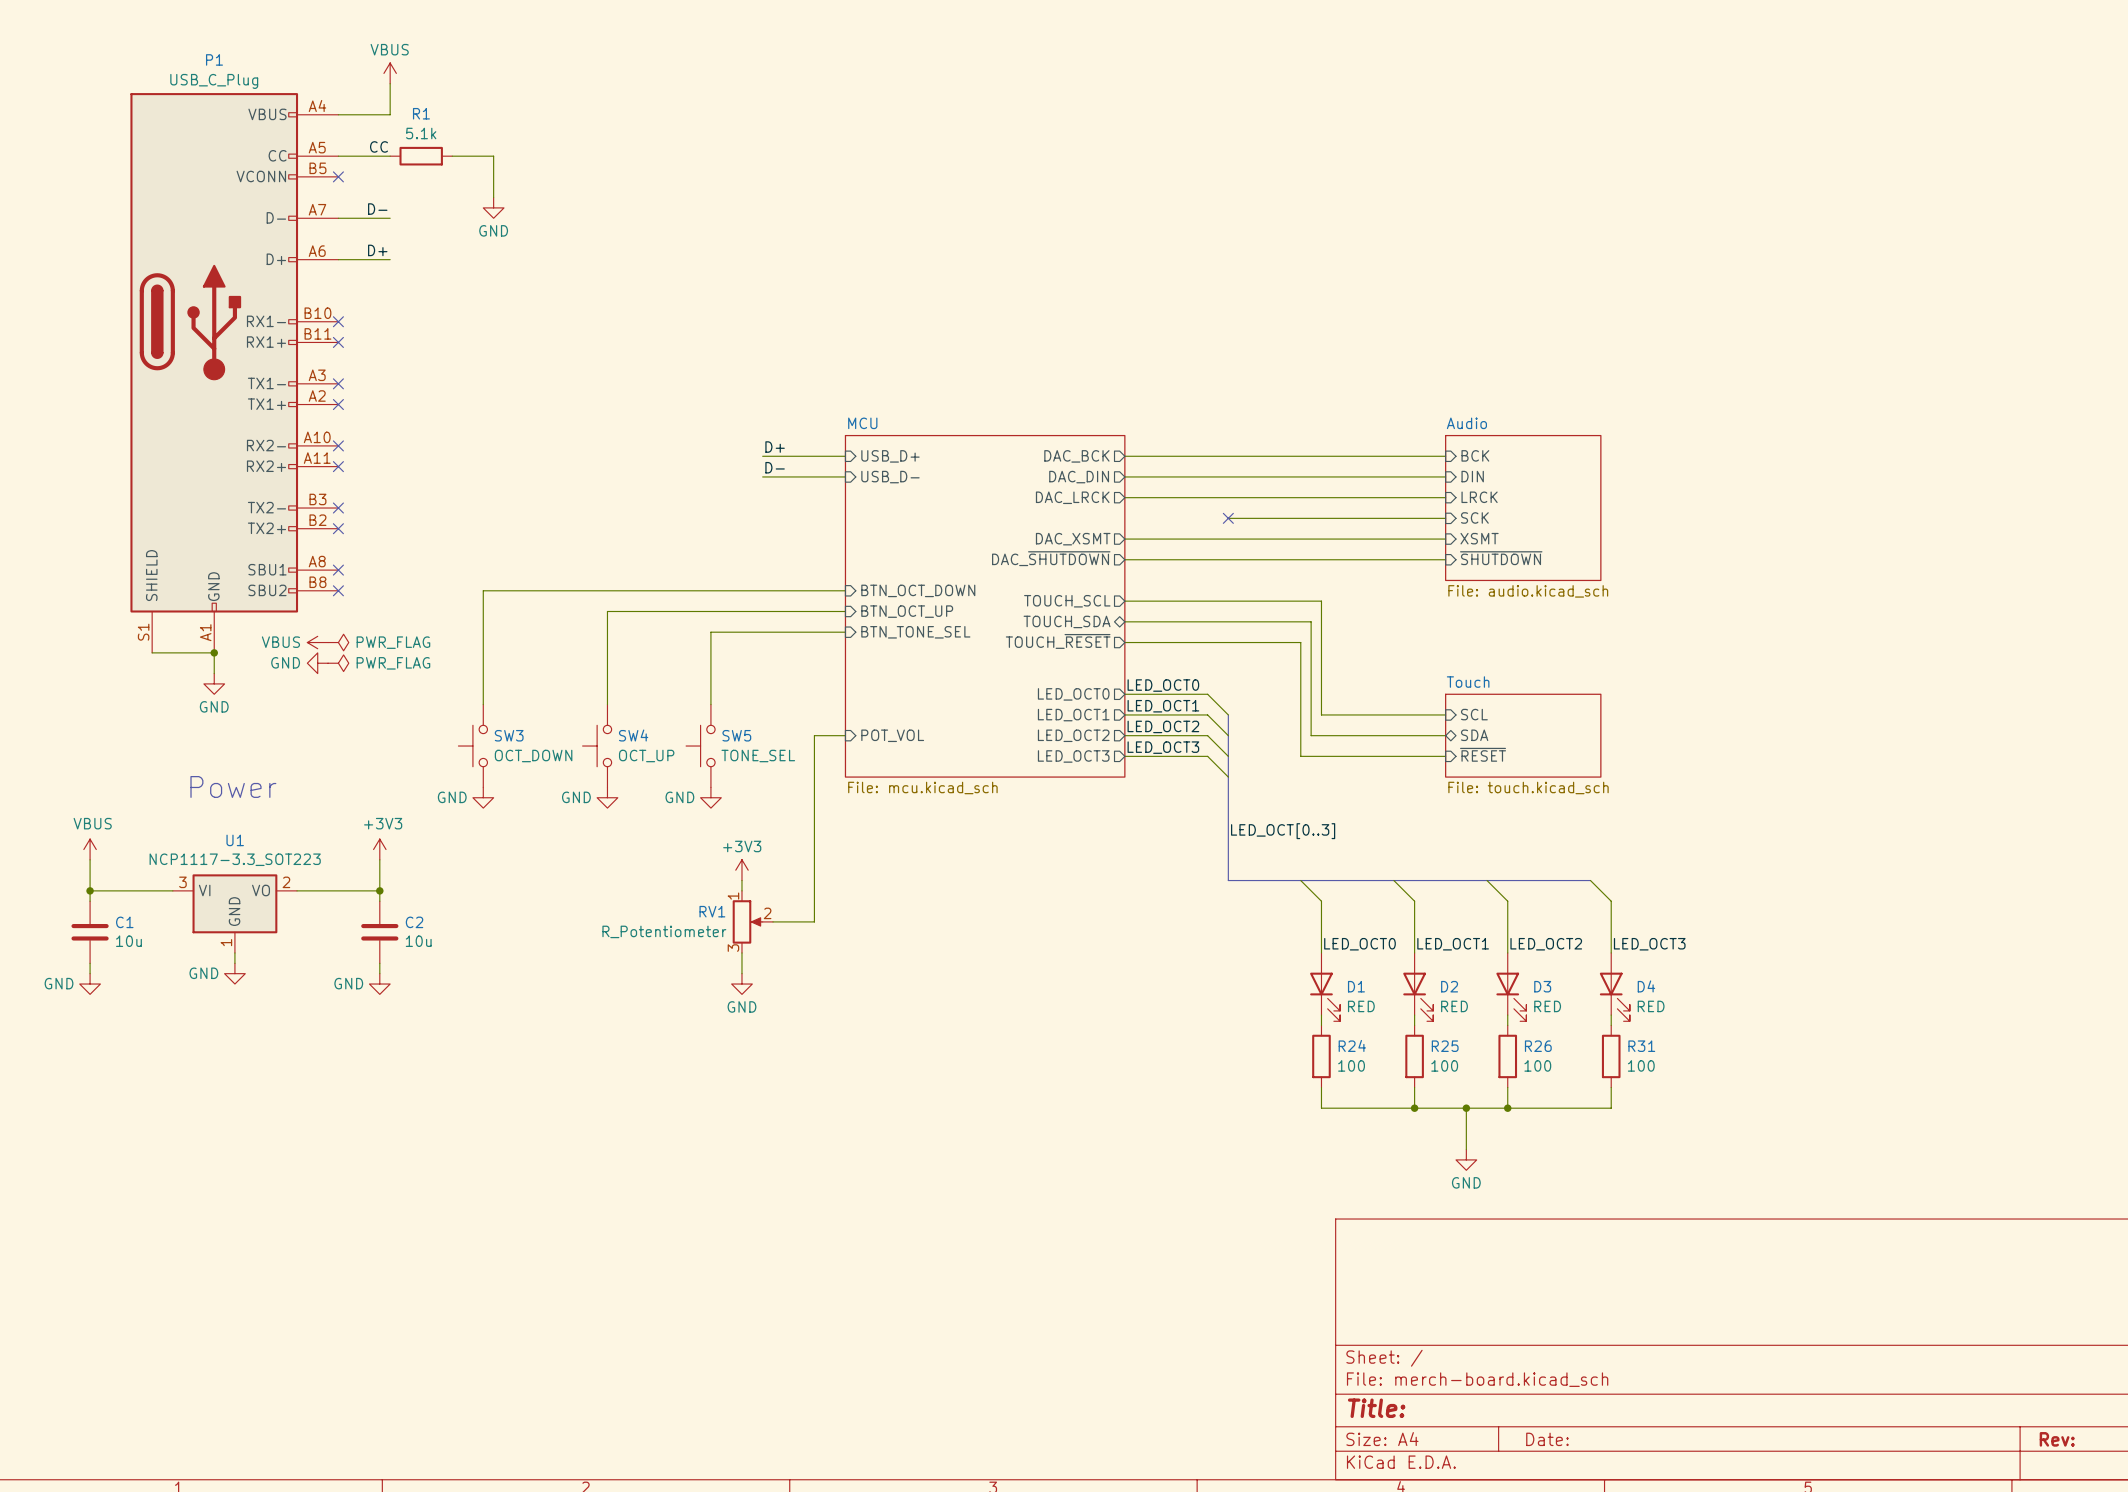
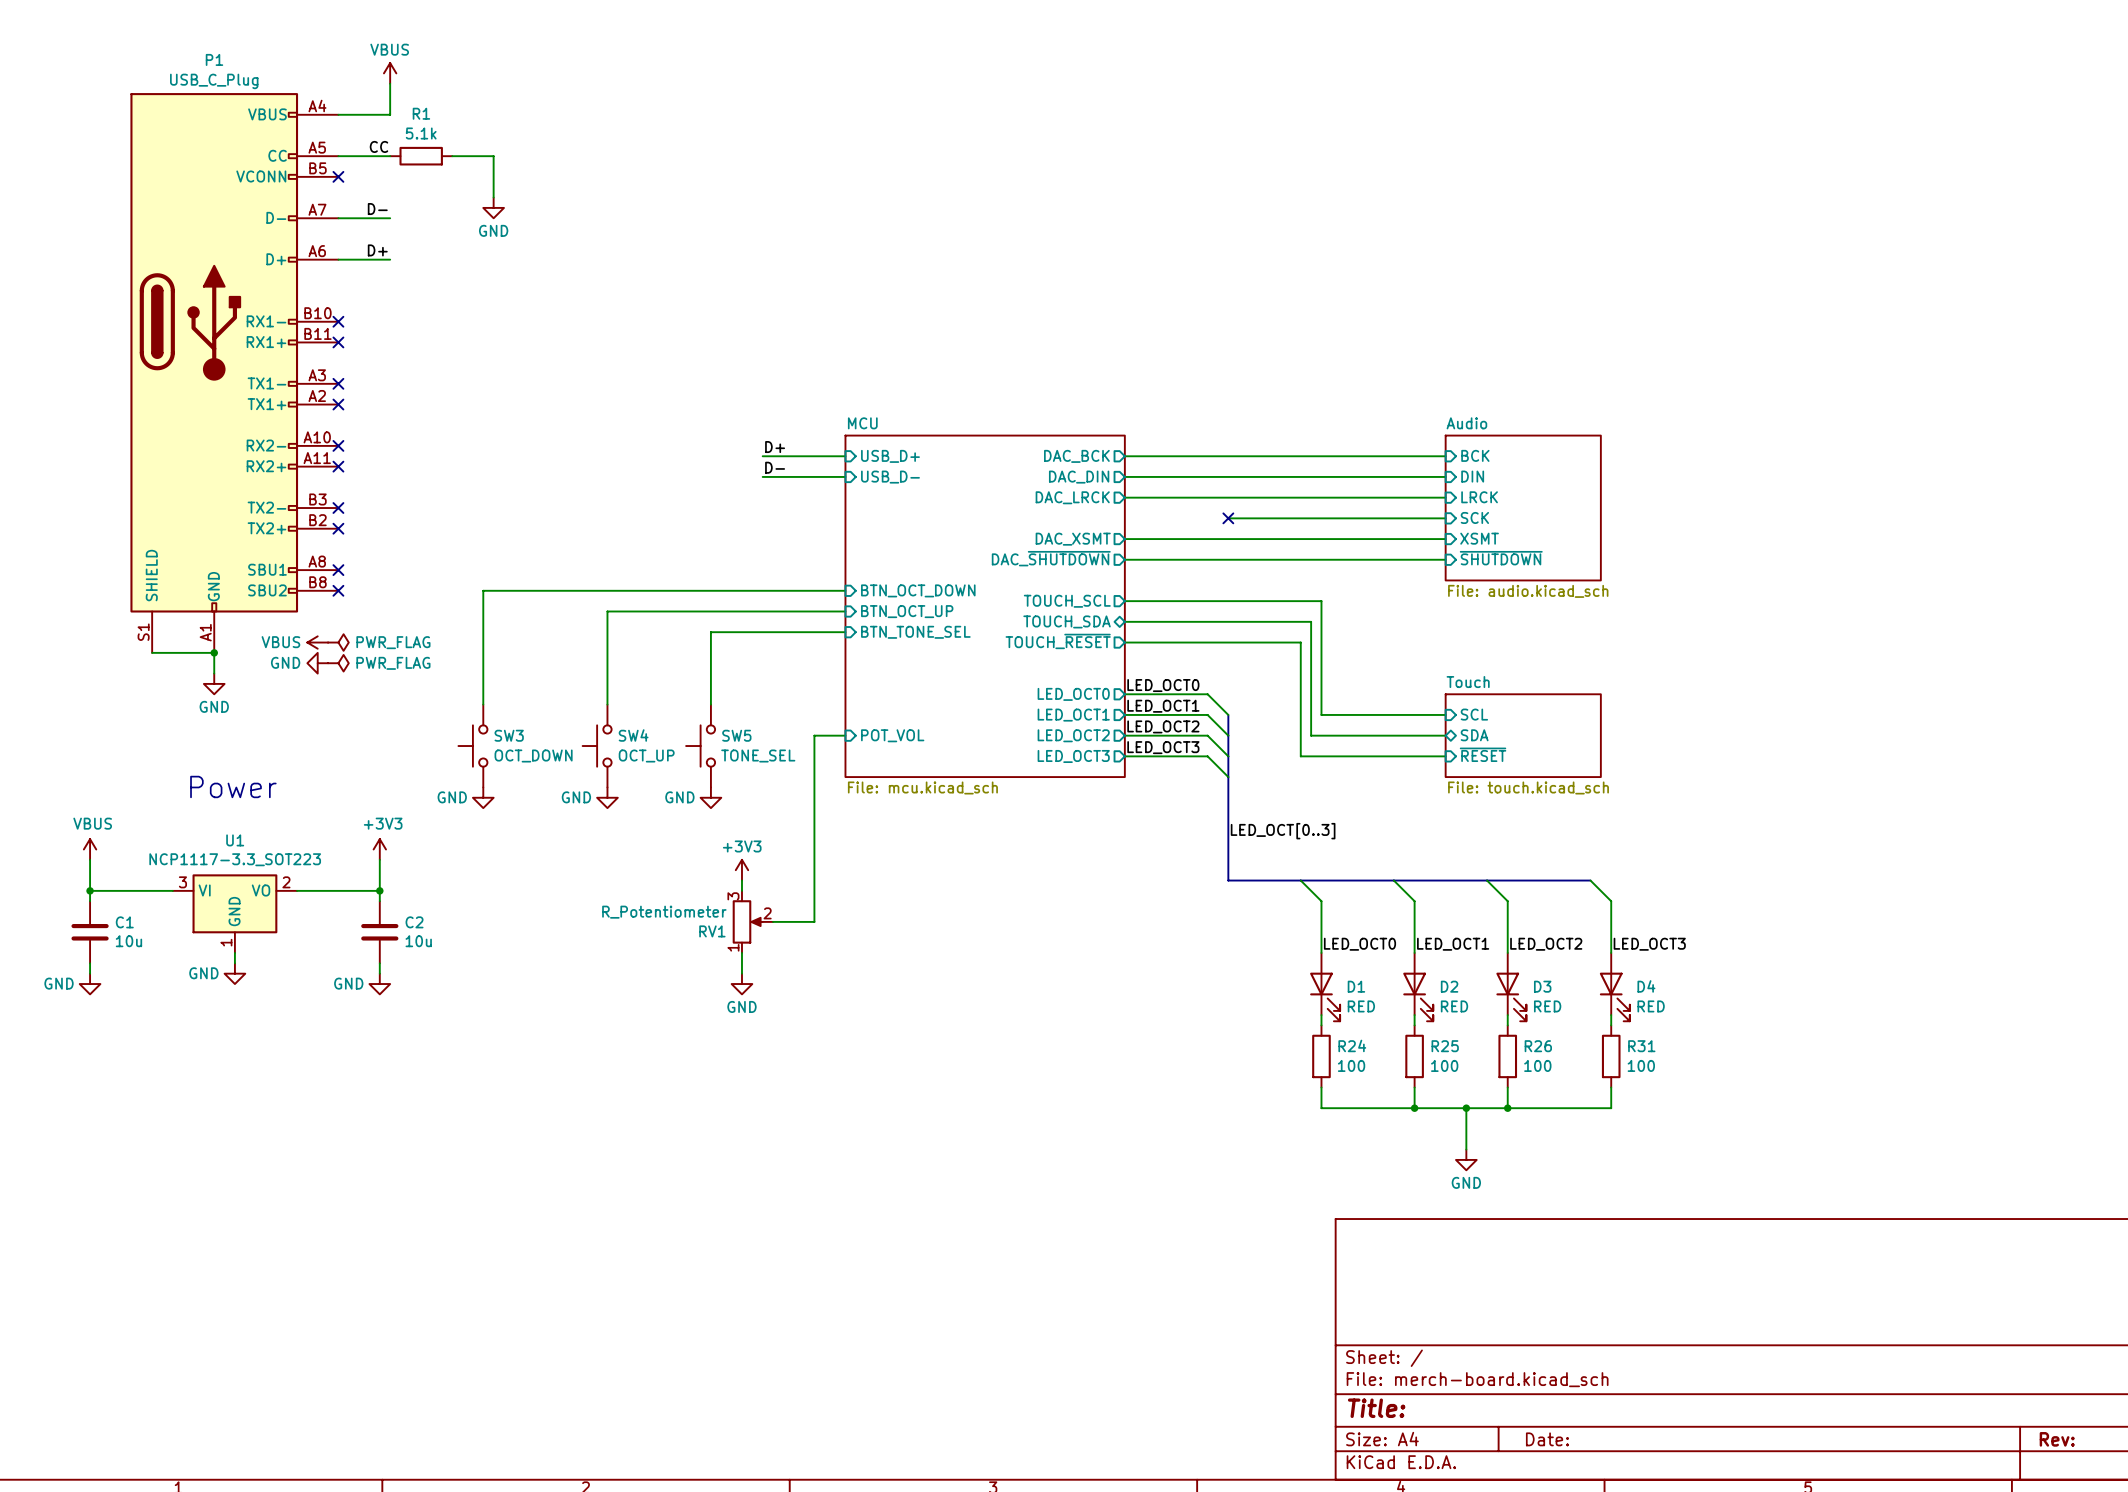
RV1 flip: as is (747, 921) -> up-down (747, 921)

